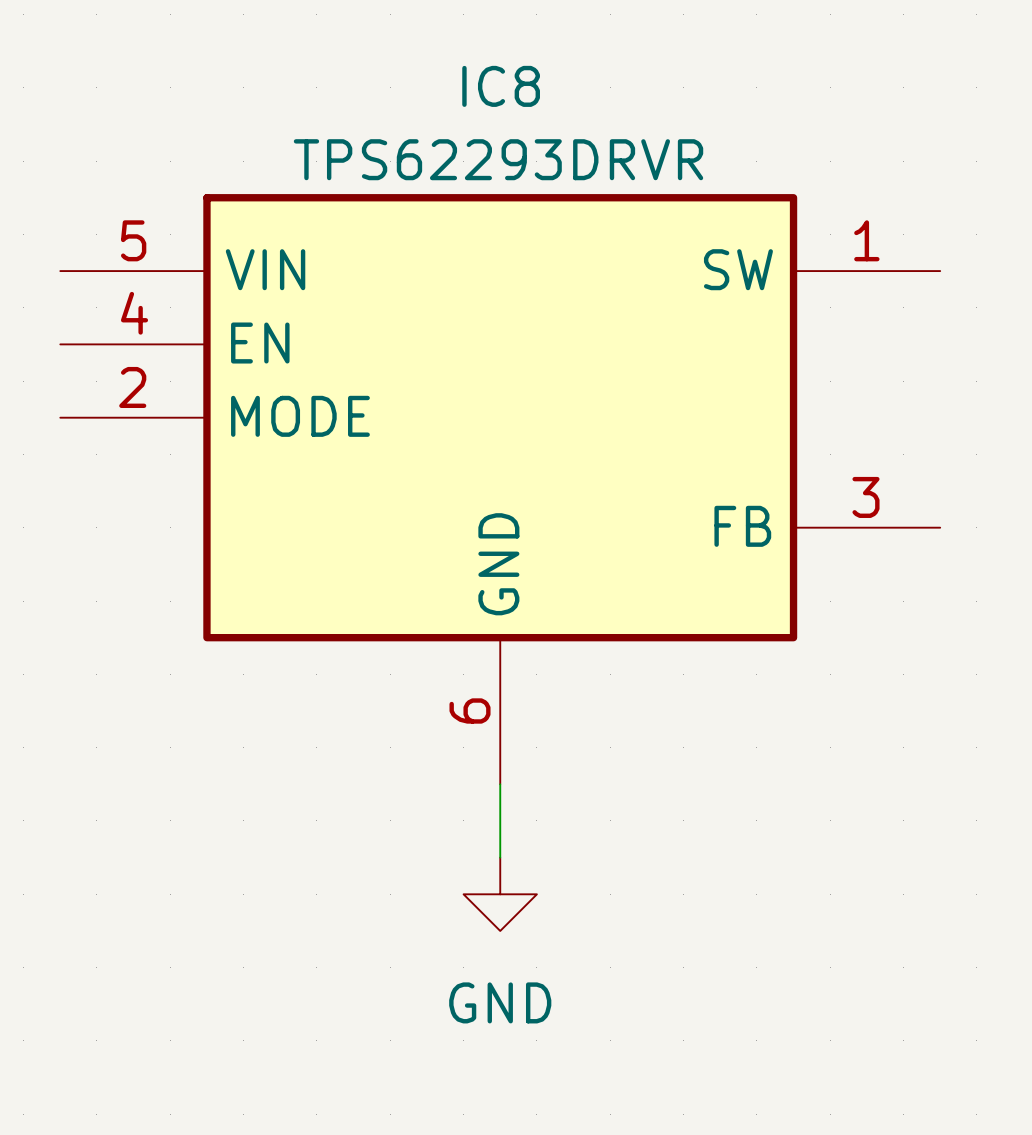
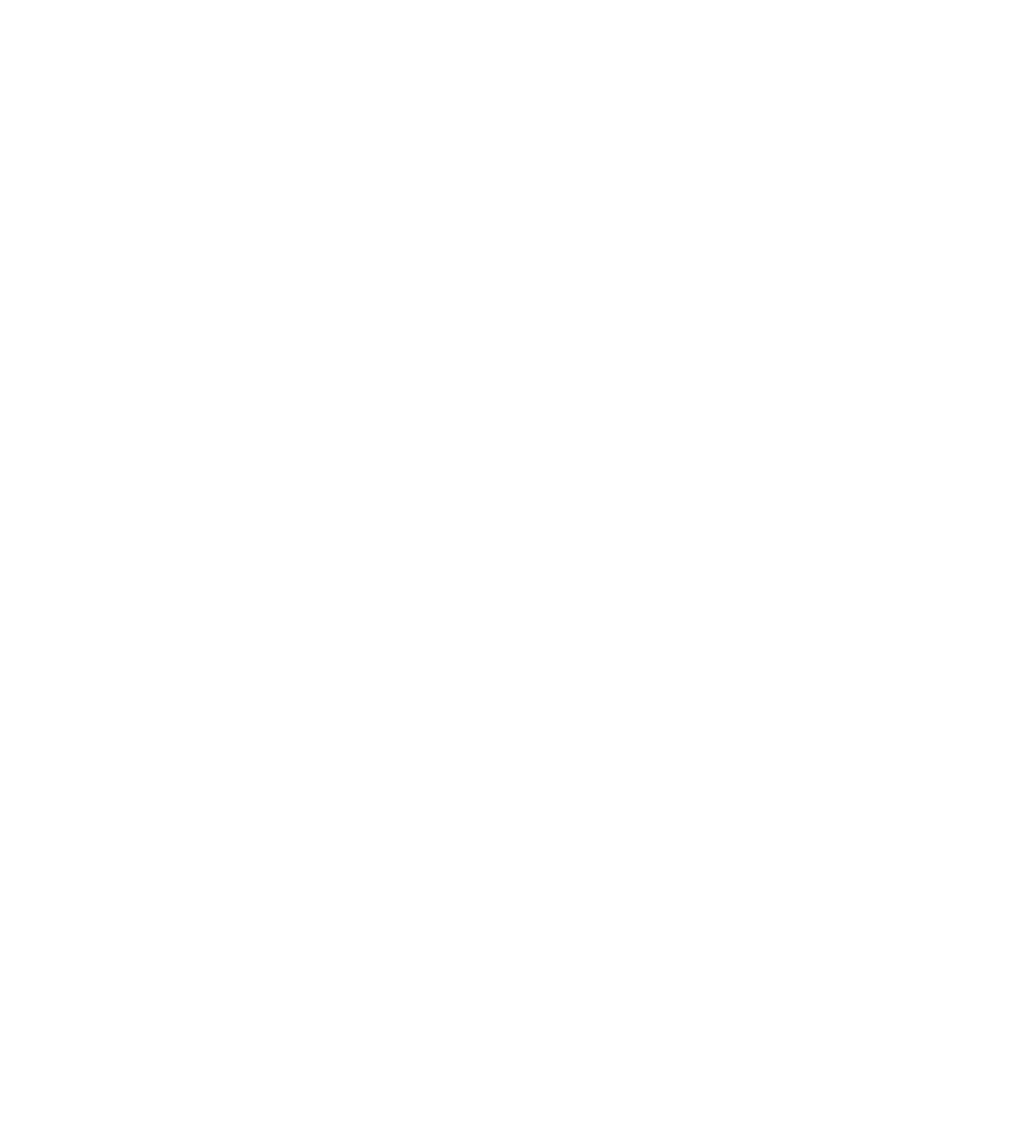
IC8: TPS62293DRVR (500, 489) -> none
wire: (500, 784) (500, 857) -> none
power symbol: GND (500, 894) -> none

